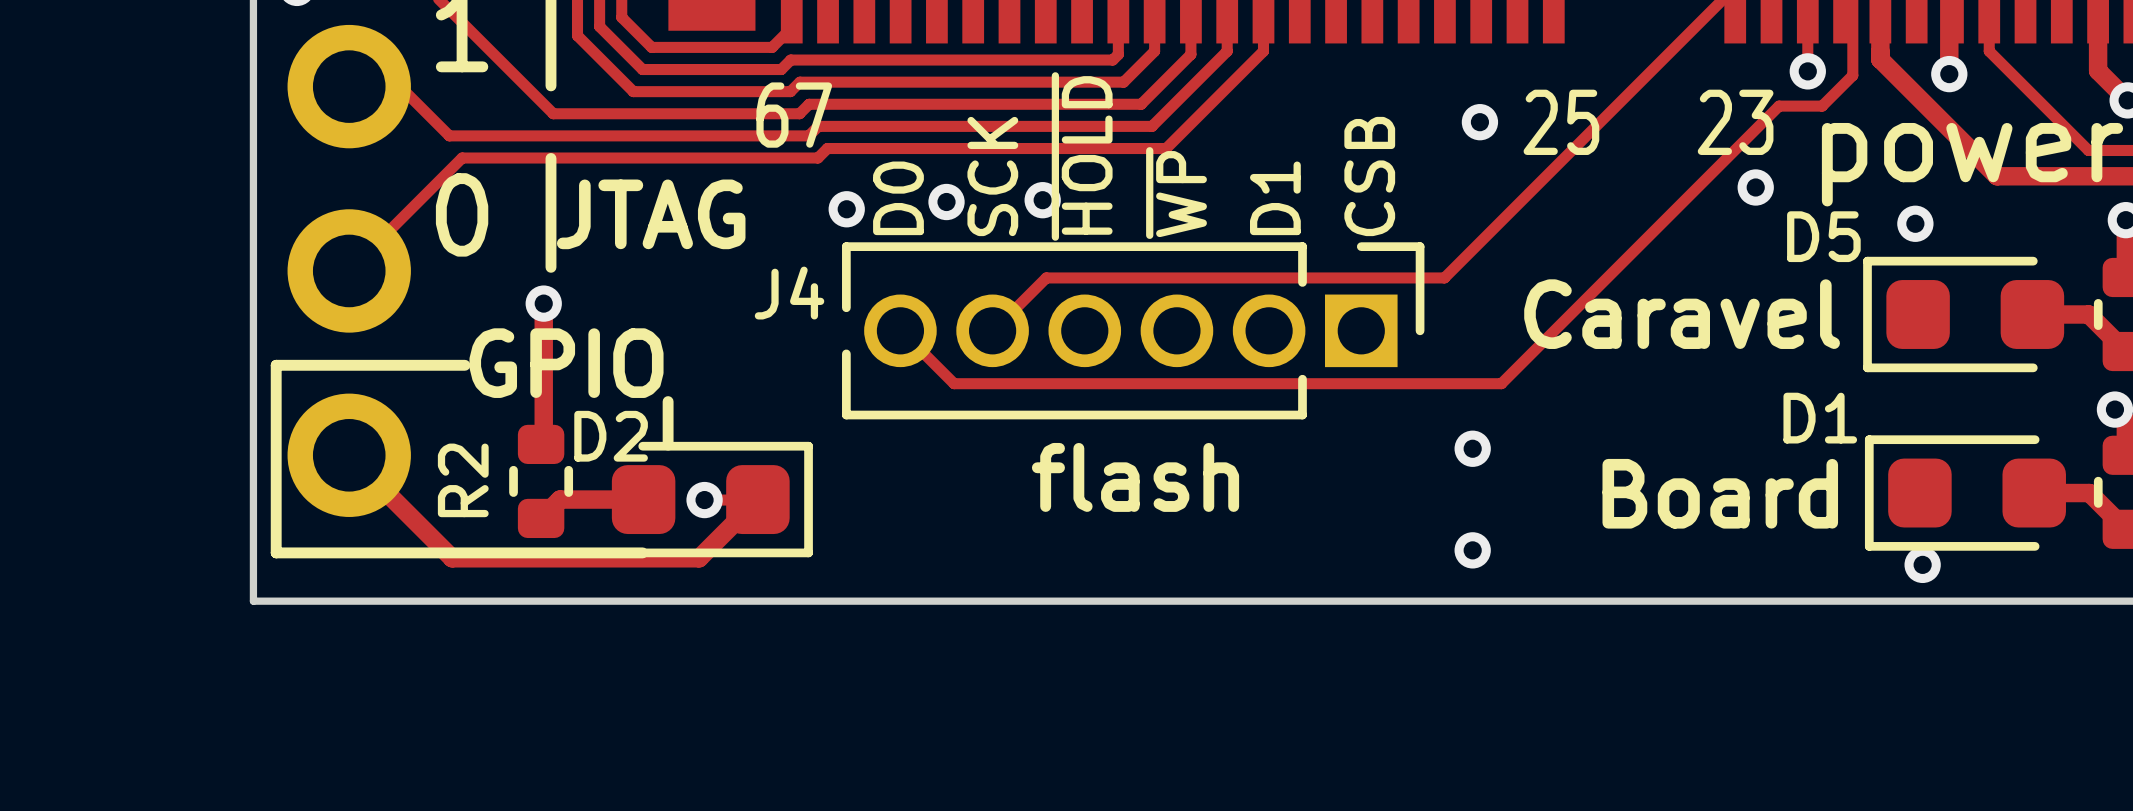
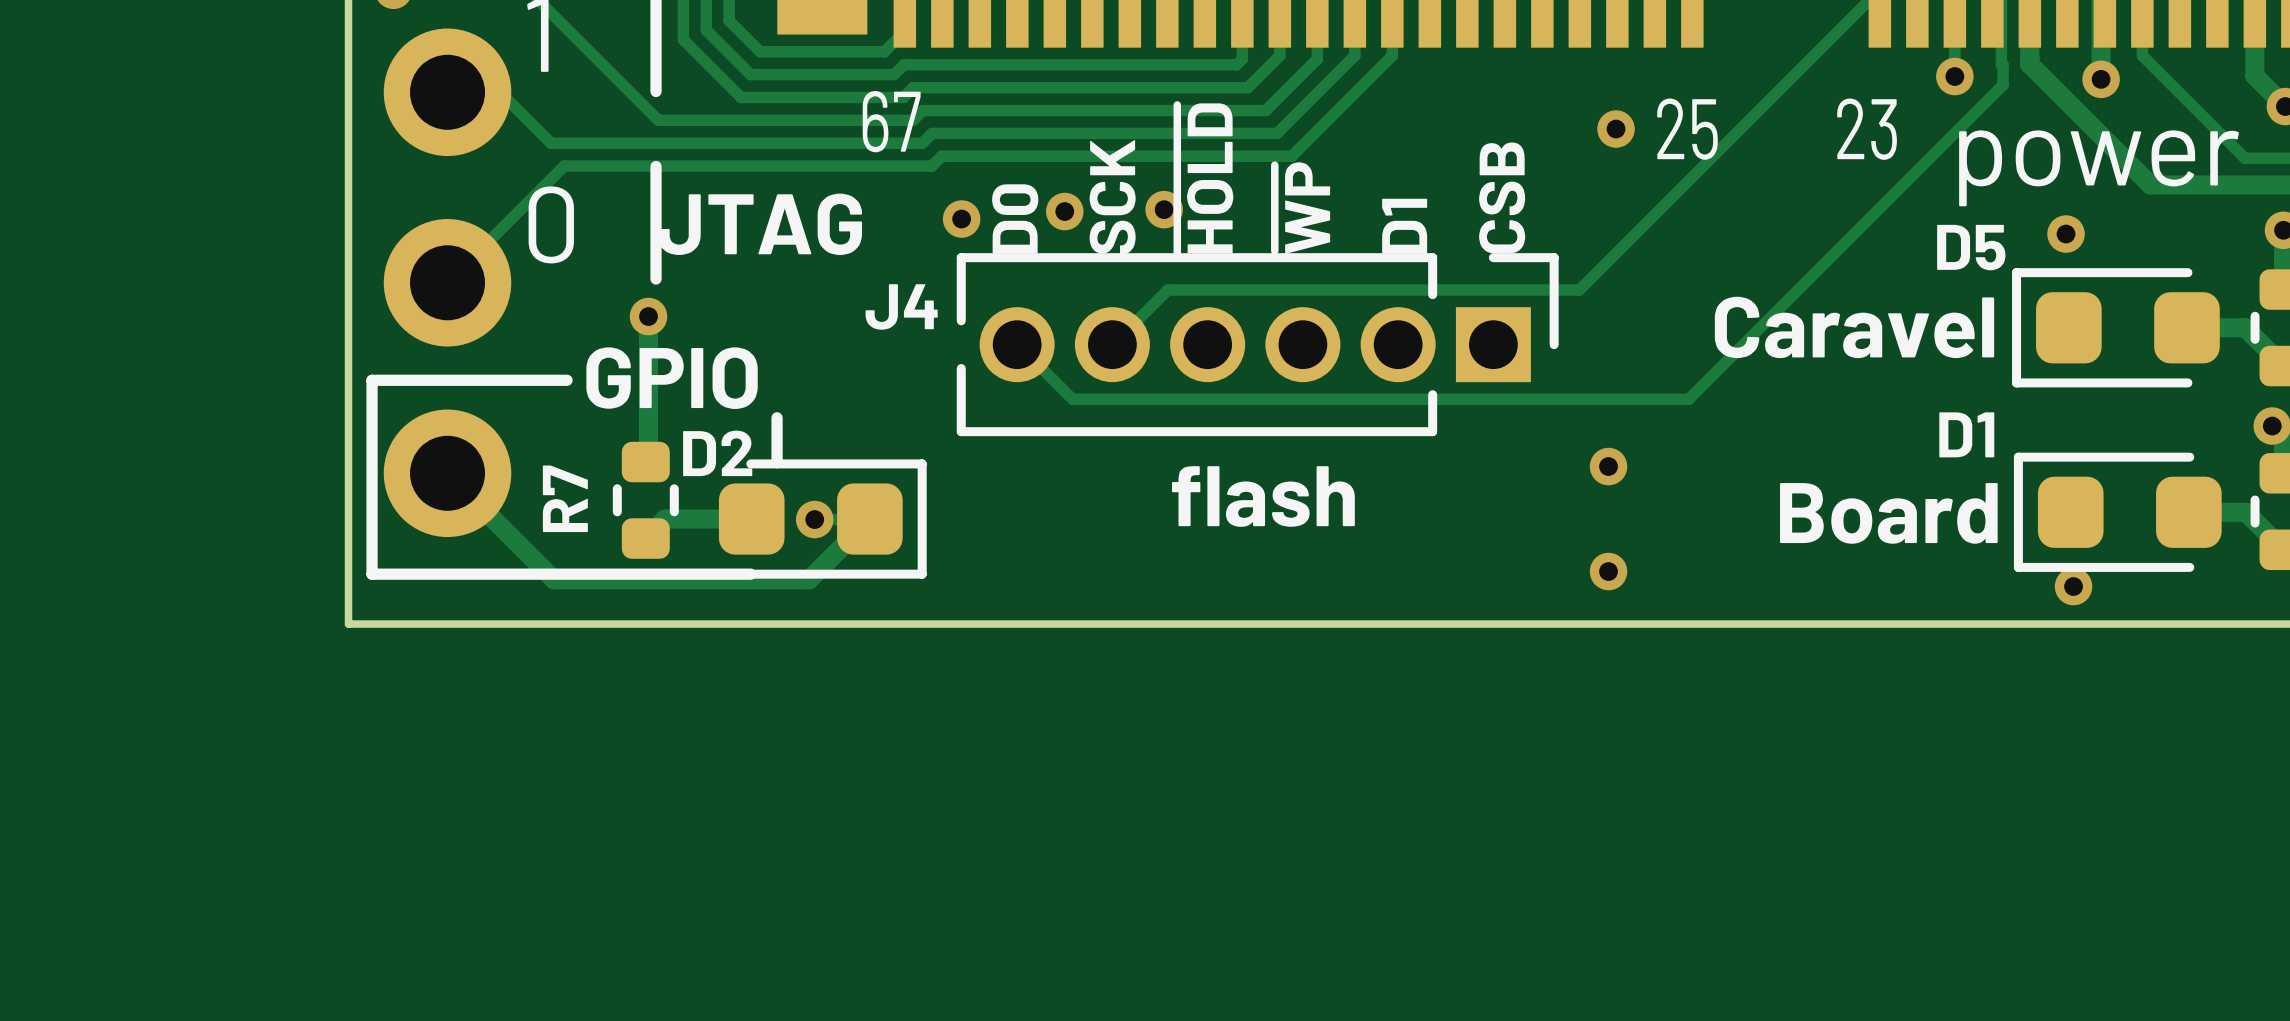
track: (1852, 60) (1852, 75) (1822, 106) (1779, 106) (1501, 383) -> (2001, 64) (2003, 64) (2003, 84) (1688, 399) (1638, 399)
via: (1755, 187) -> none
R2 name: R2 (463, 480) -> R7 (565, 498)

